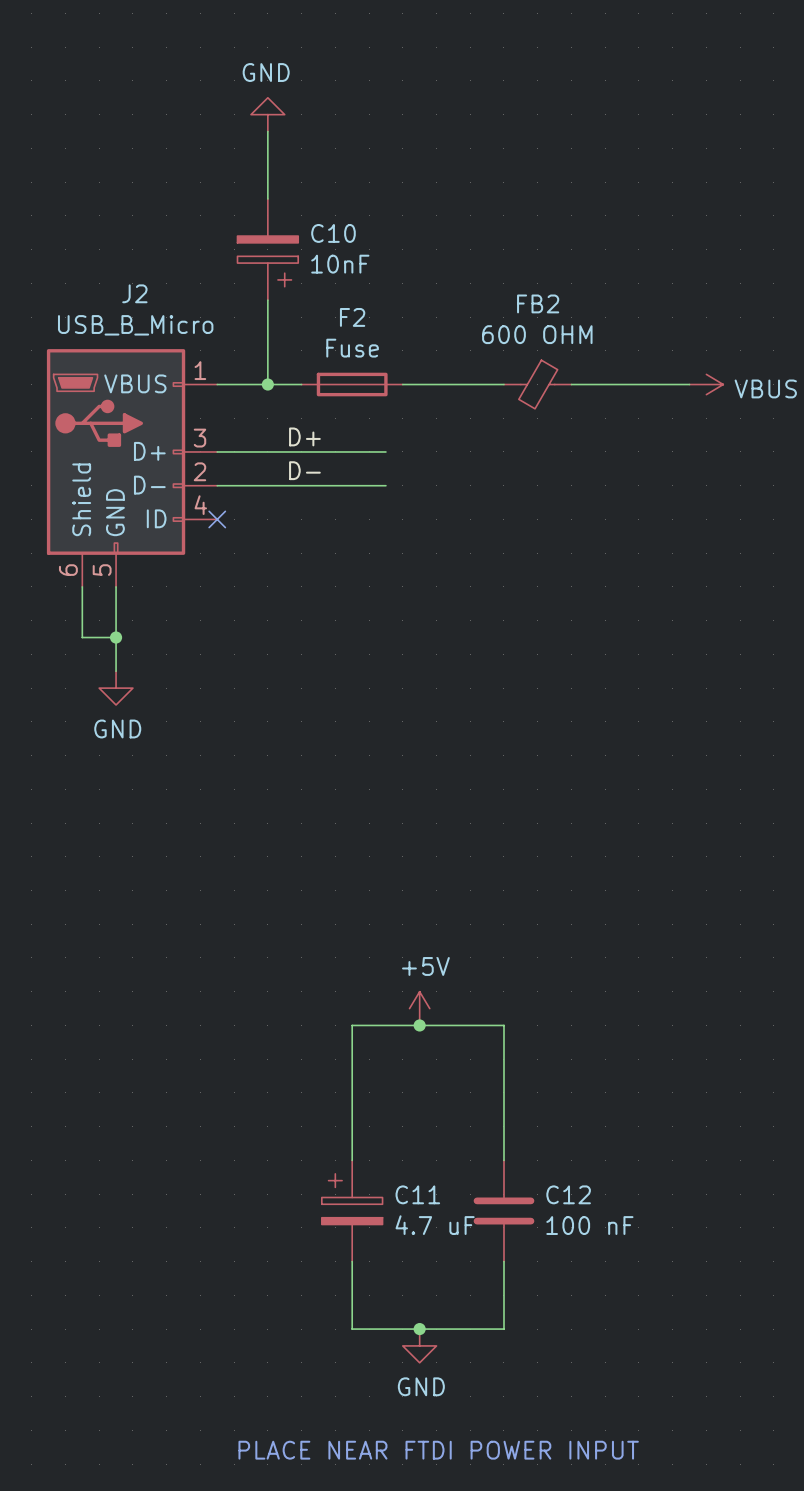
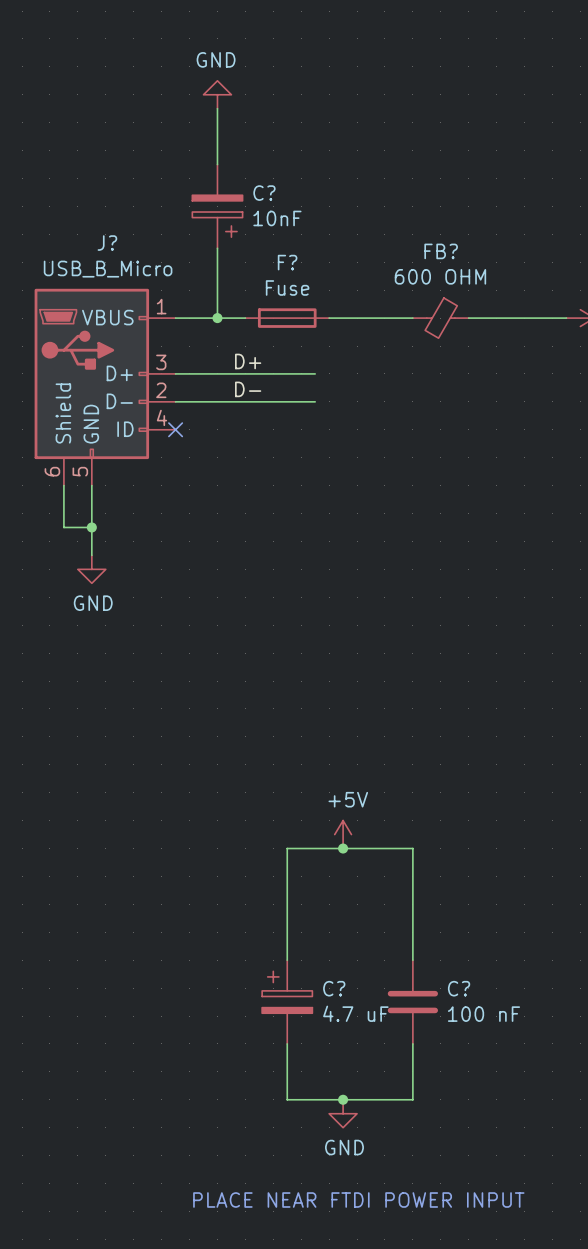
C10 name: C10 (333, 233) -> C? (264, 193)
J2 name: J2 (134, 293) -> J? (107, 243)
FB2 name: FB2 (538, 303) -> FB? (441, 251)
F2 name: F2 (352, 317) -> F? (287, 262)
C11 name: C11 (417, 1194) -> C? (334, 988)
C12 name: C12 (568, 1194) -> C? (459, 988)

